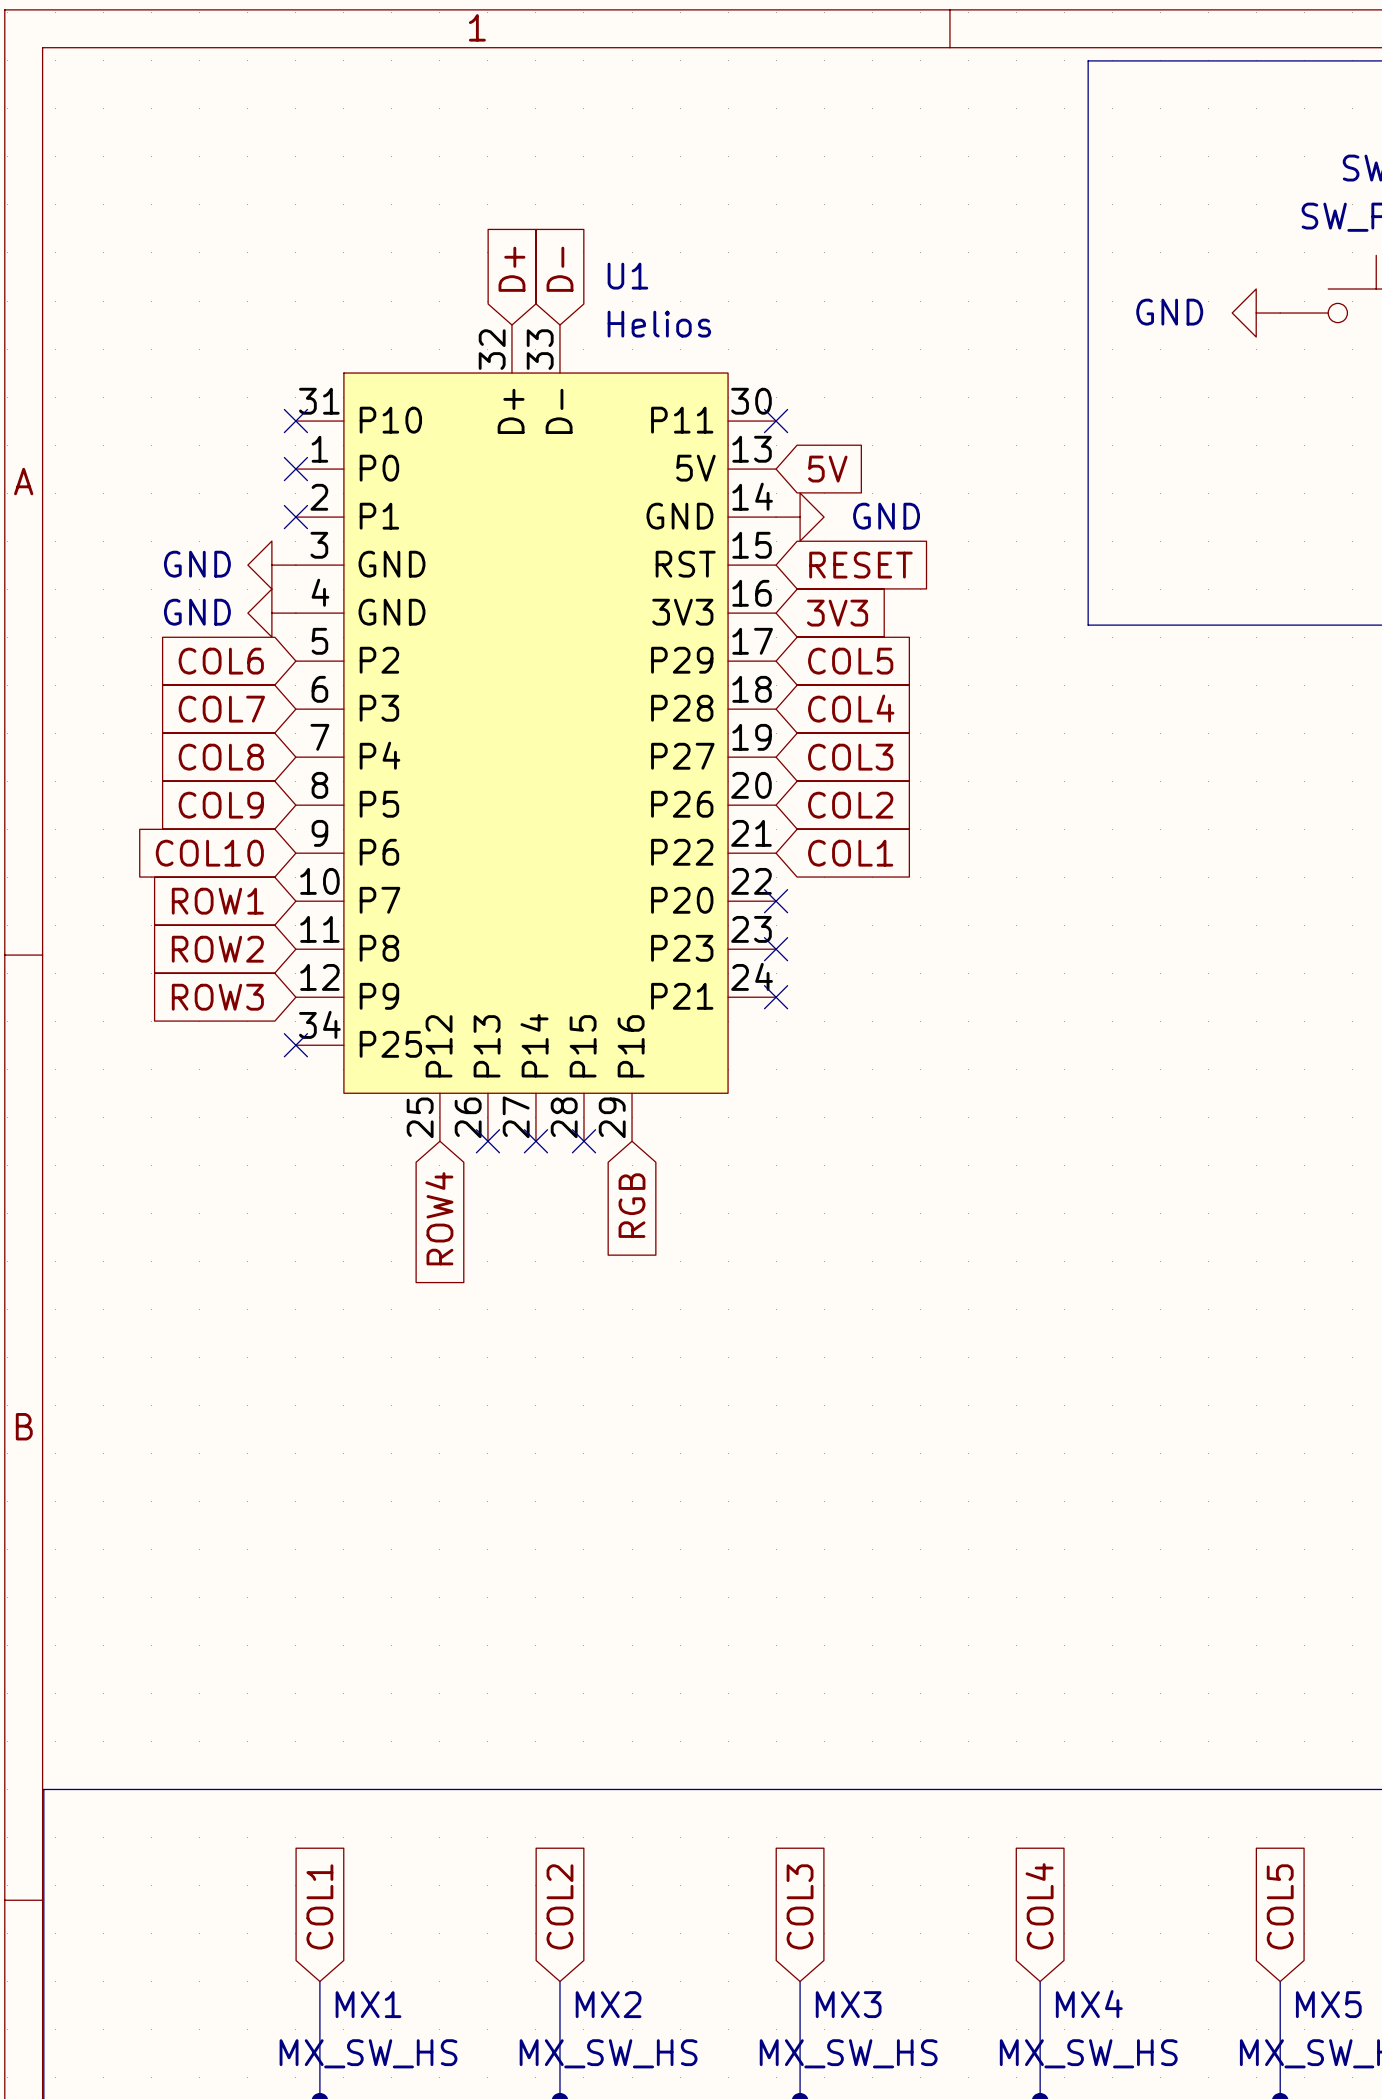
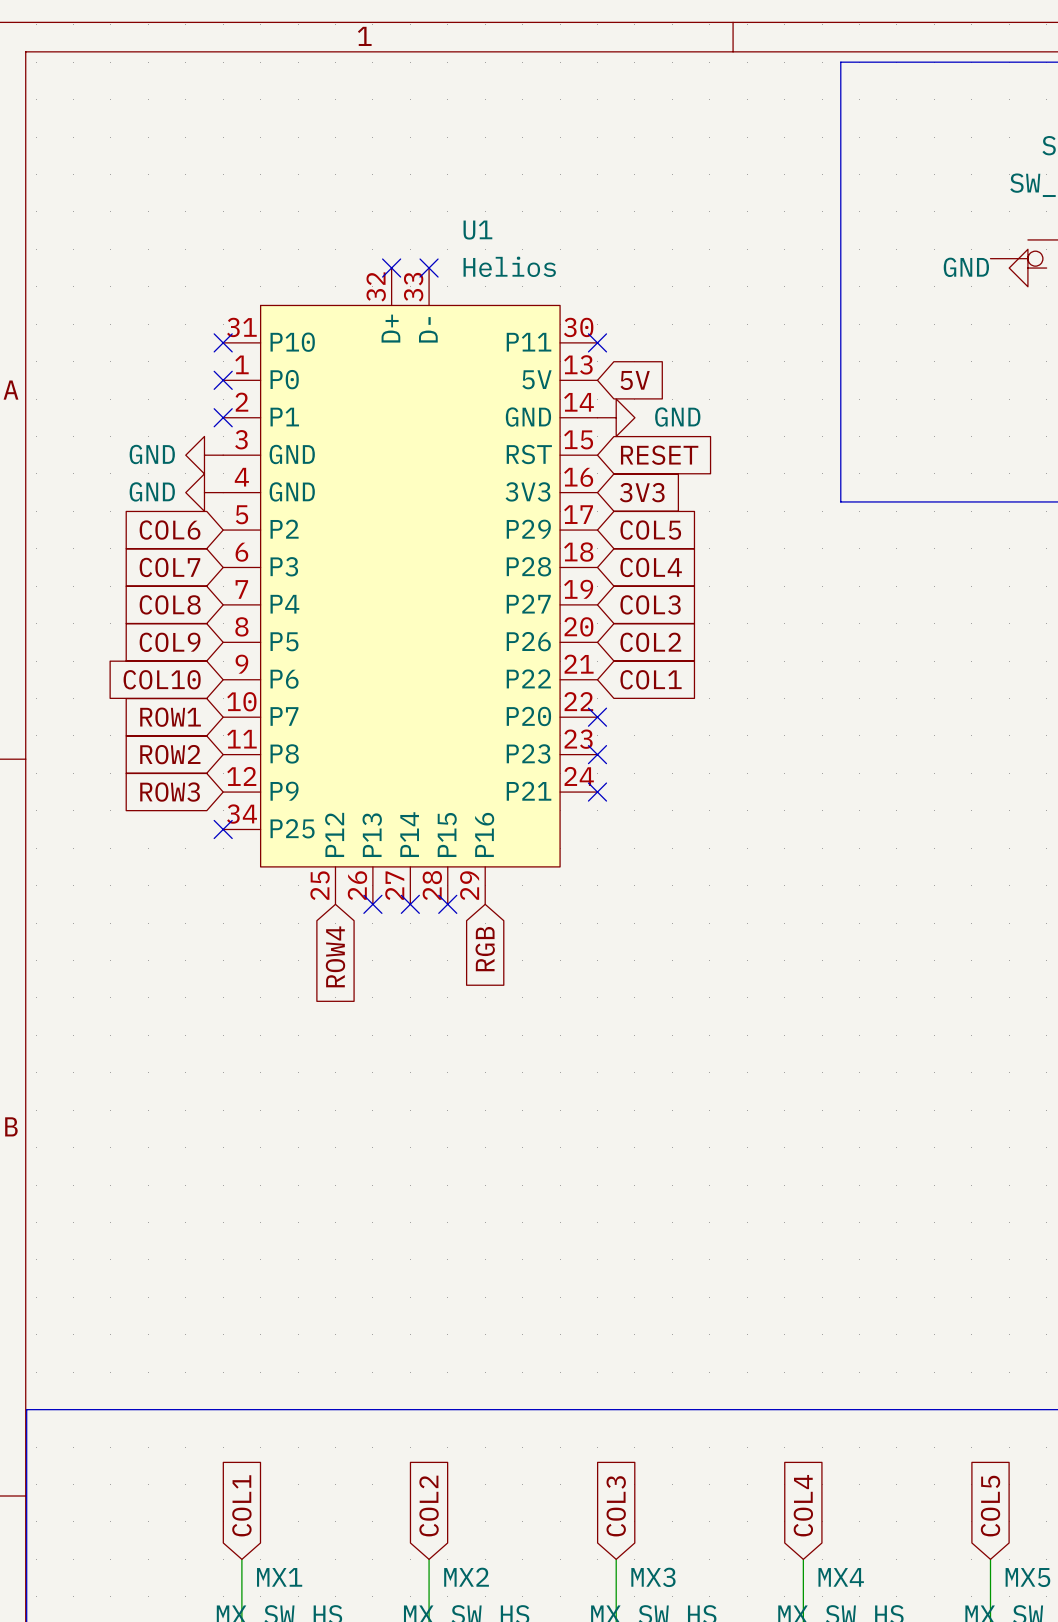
global label: D+ (511, 269) -> none
global label: D- (559, 269) -> none
power symbol position: GND (1256, 313) -> GND (1027, 268)
no-connect mark: none -> (391, 268)
no-connect mark: none -> (429, 268)

